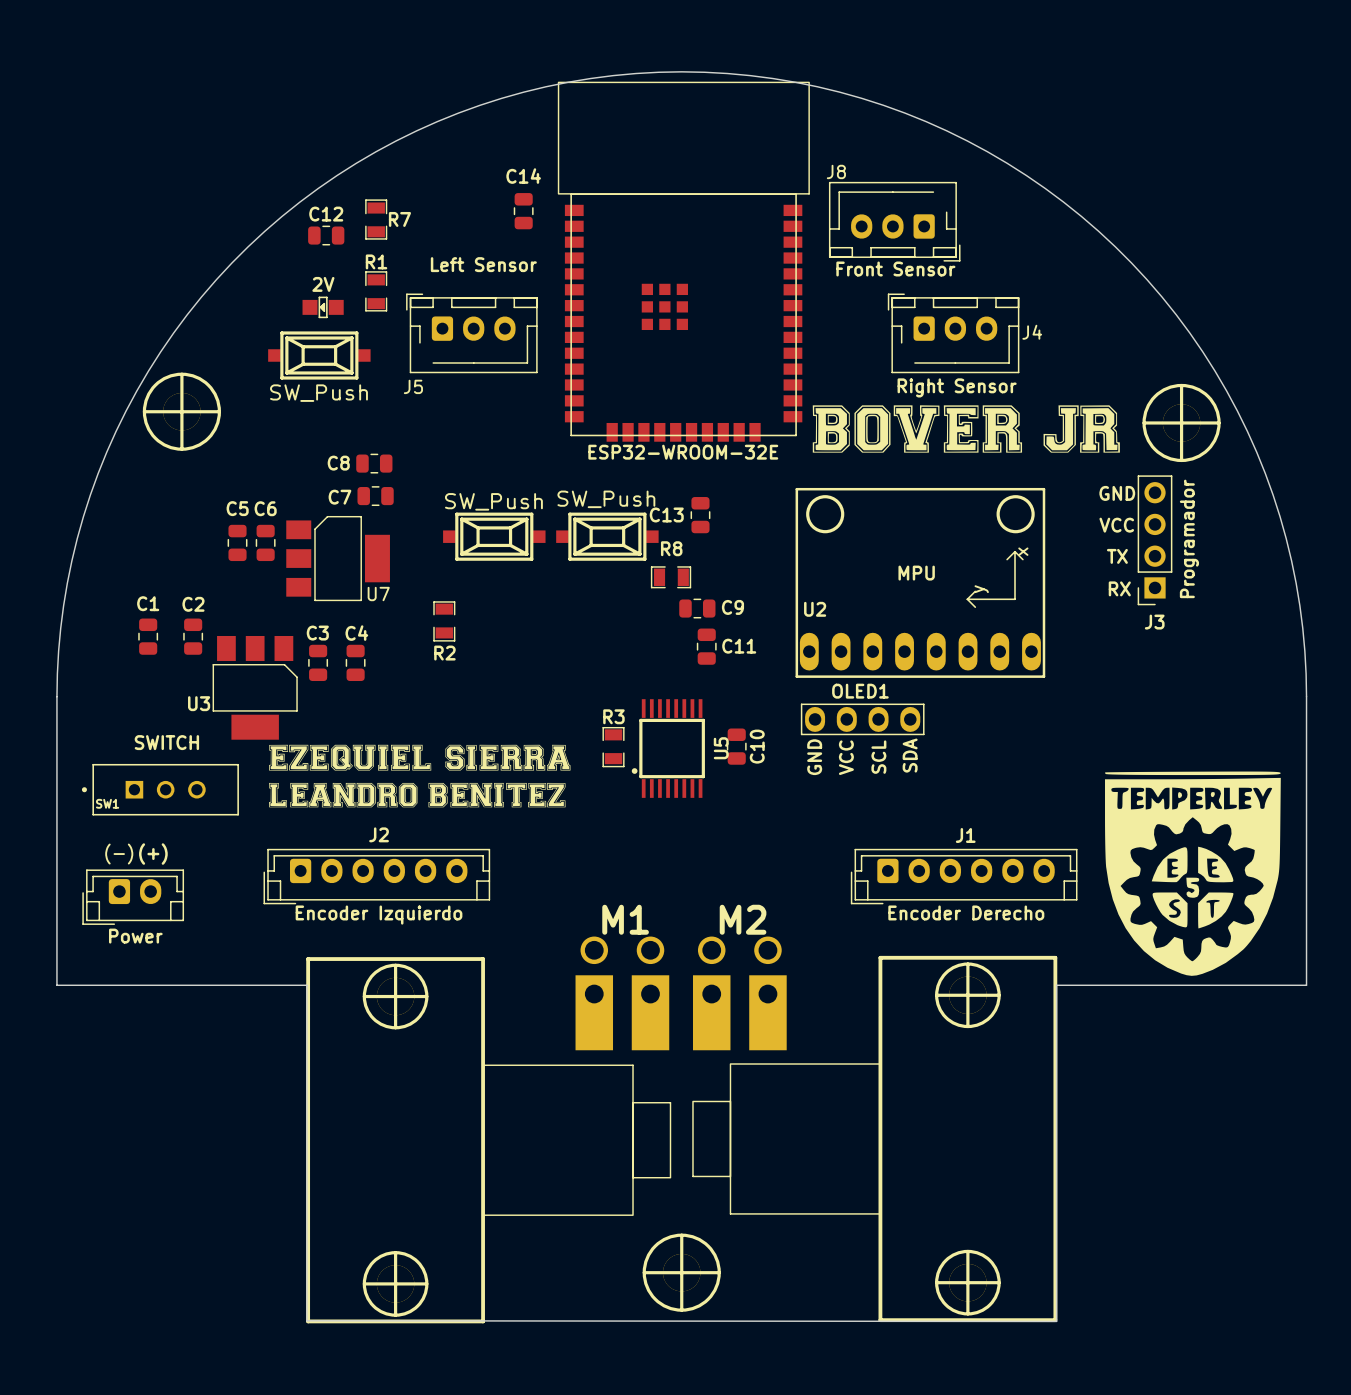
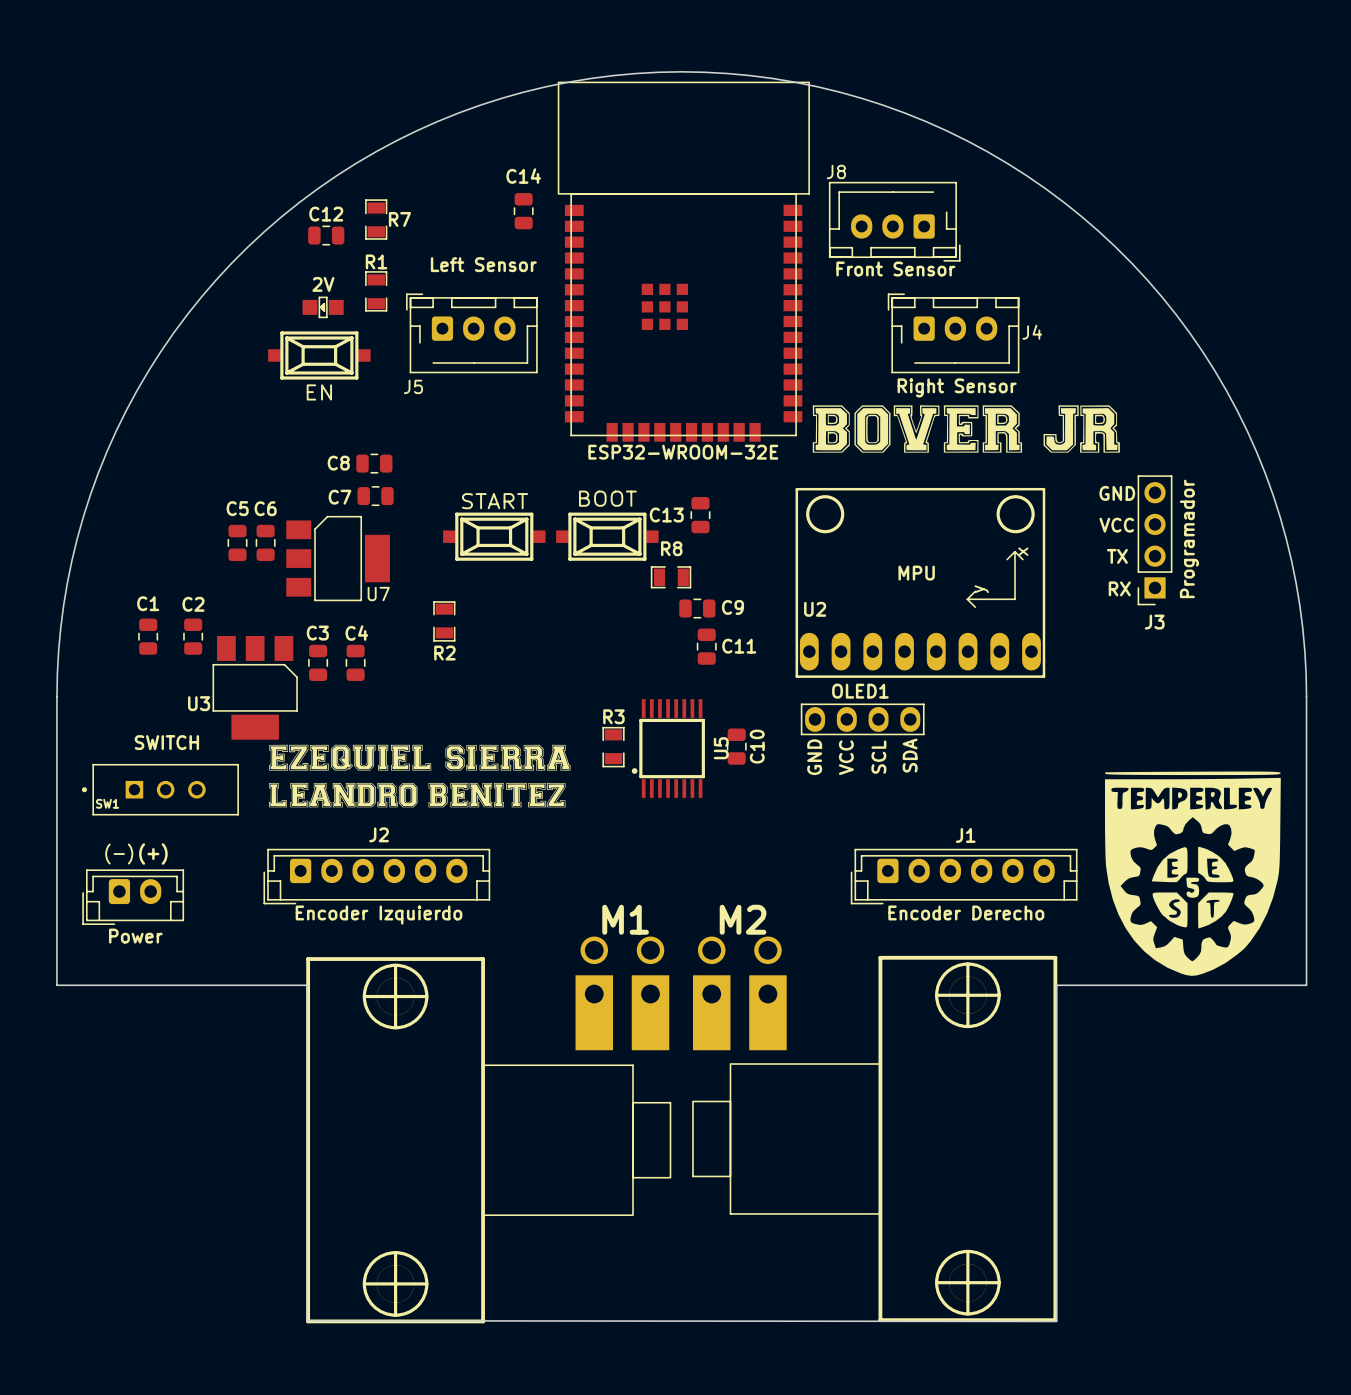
part value: SW_Push (318, 393) -> EN (319, 392)
part: (181, 411) -> none
part: (1181, 422) -> none
part value: SW_Push (606, 499) -> BOOT (607, 498)
part value: SW_Push (493, 501) -> START (495, 501)
part: (681, 1272) -> none

